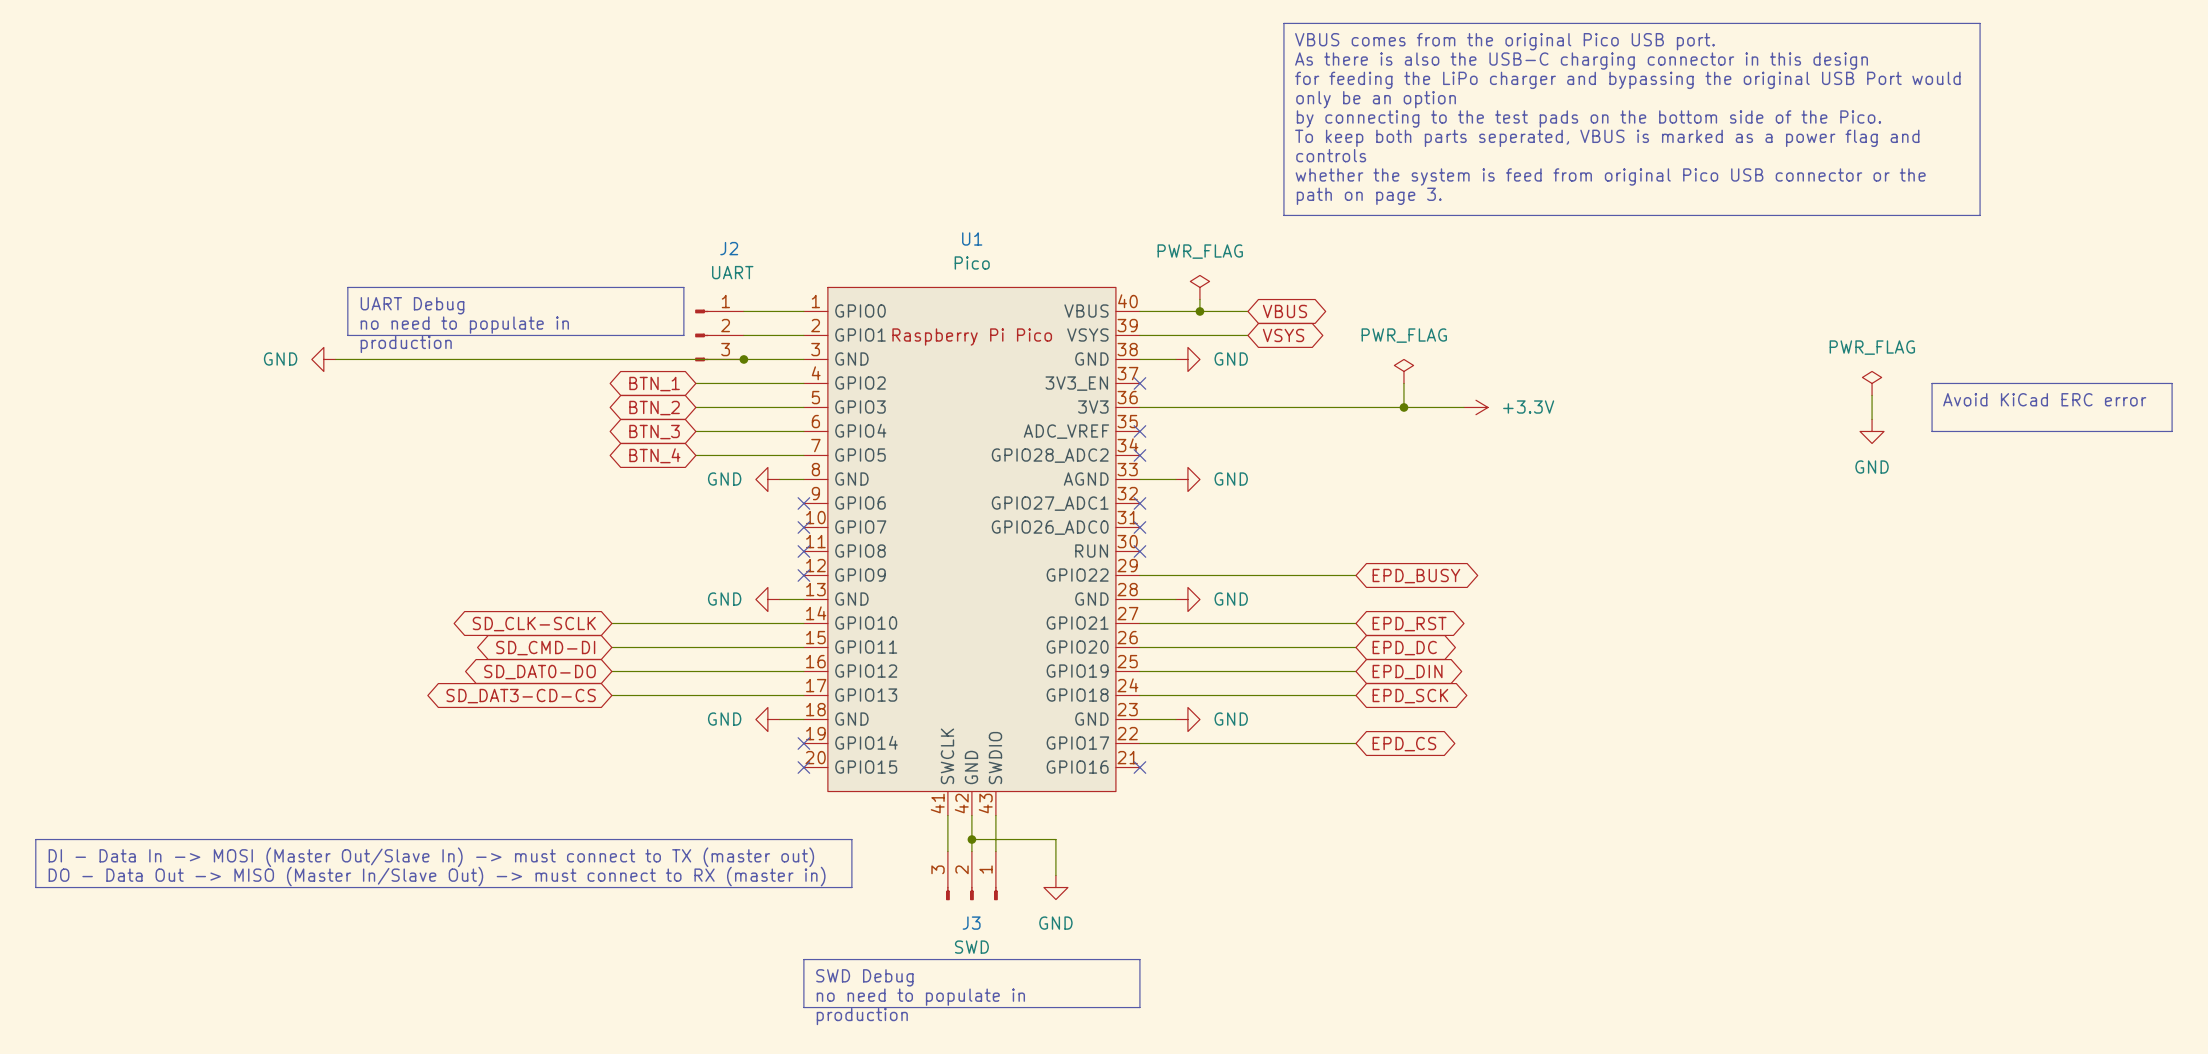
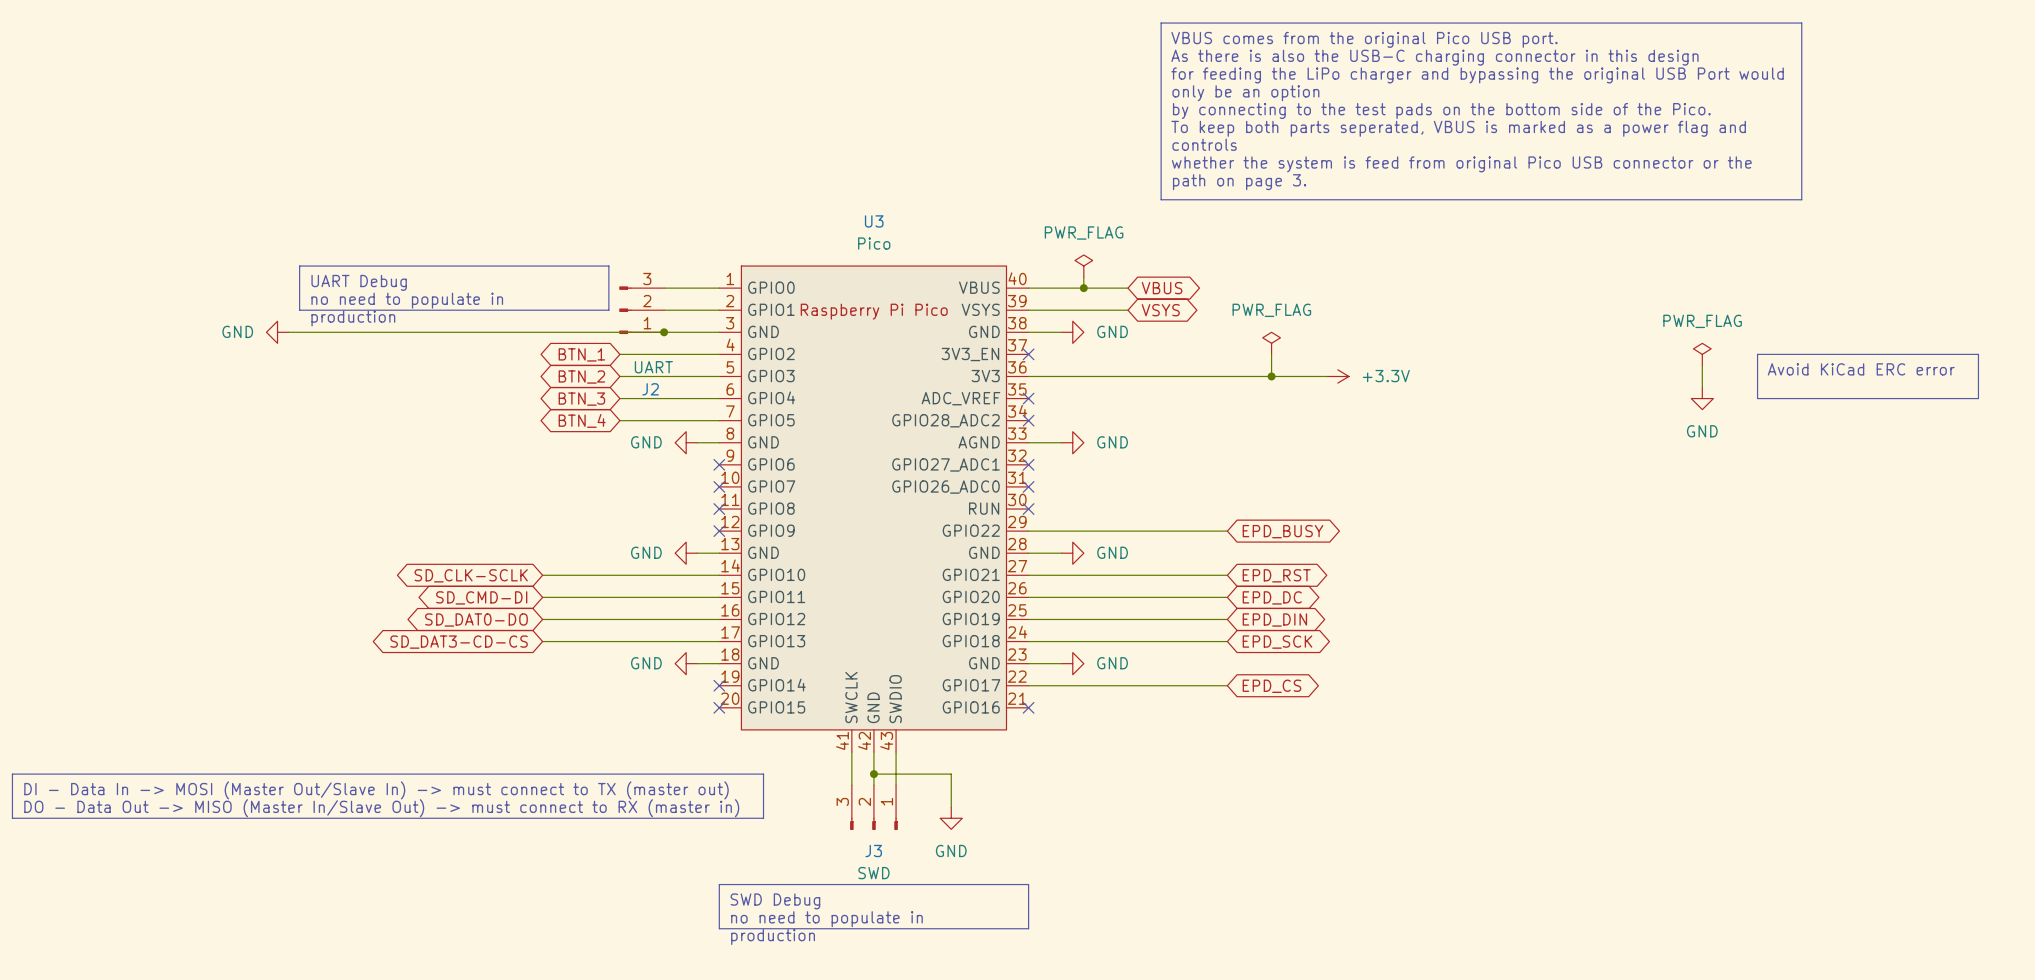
U1 name: U1 (972, 238) -> U3 (874, 221)
J2 flip: as is (701, 335) -> up-down (625, 310)

